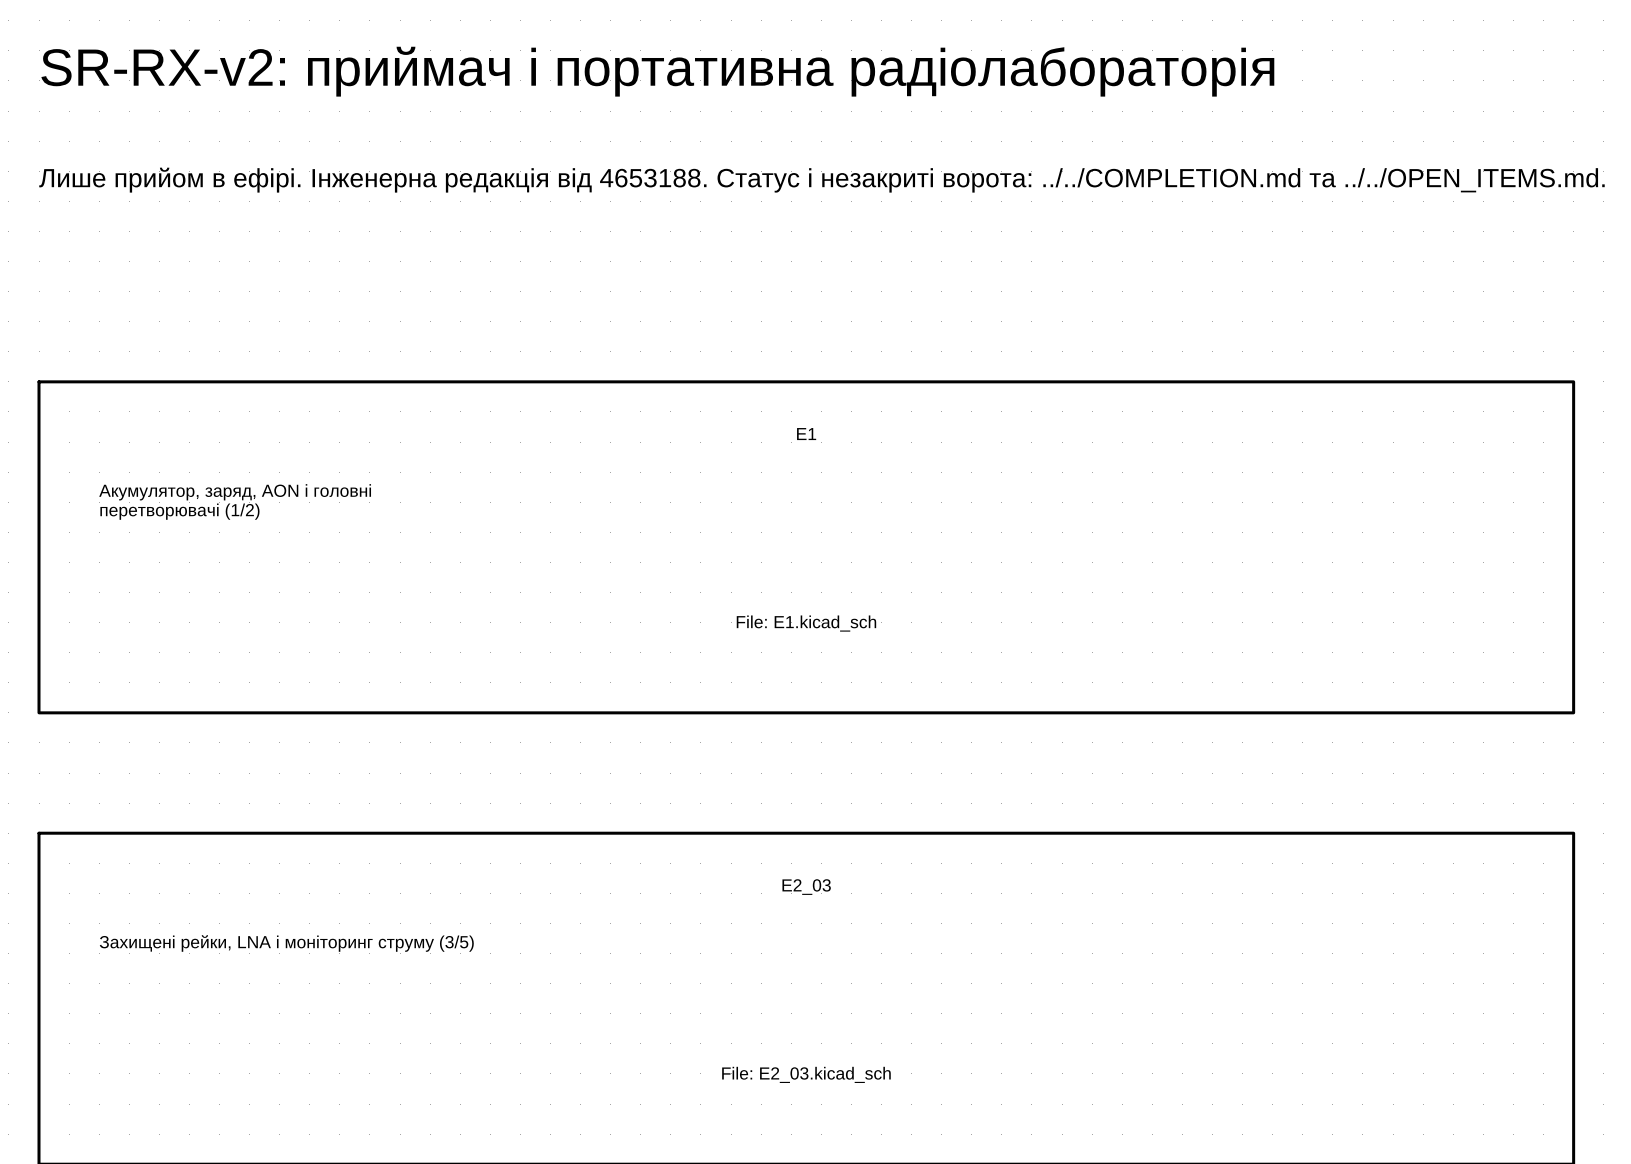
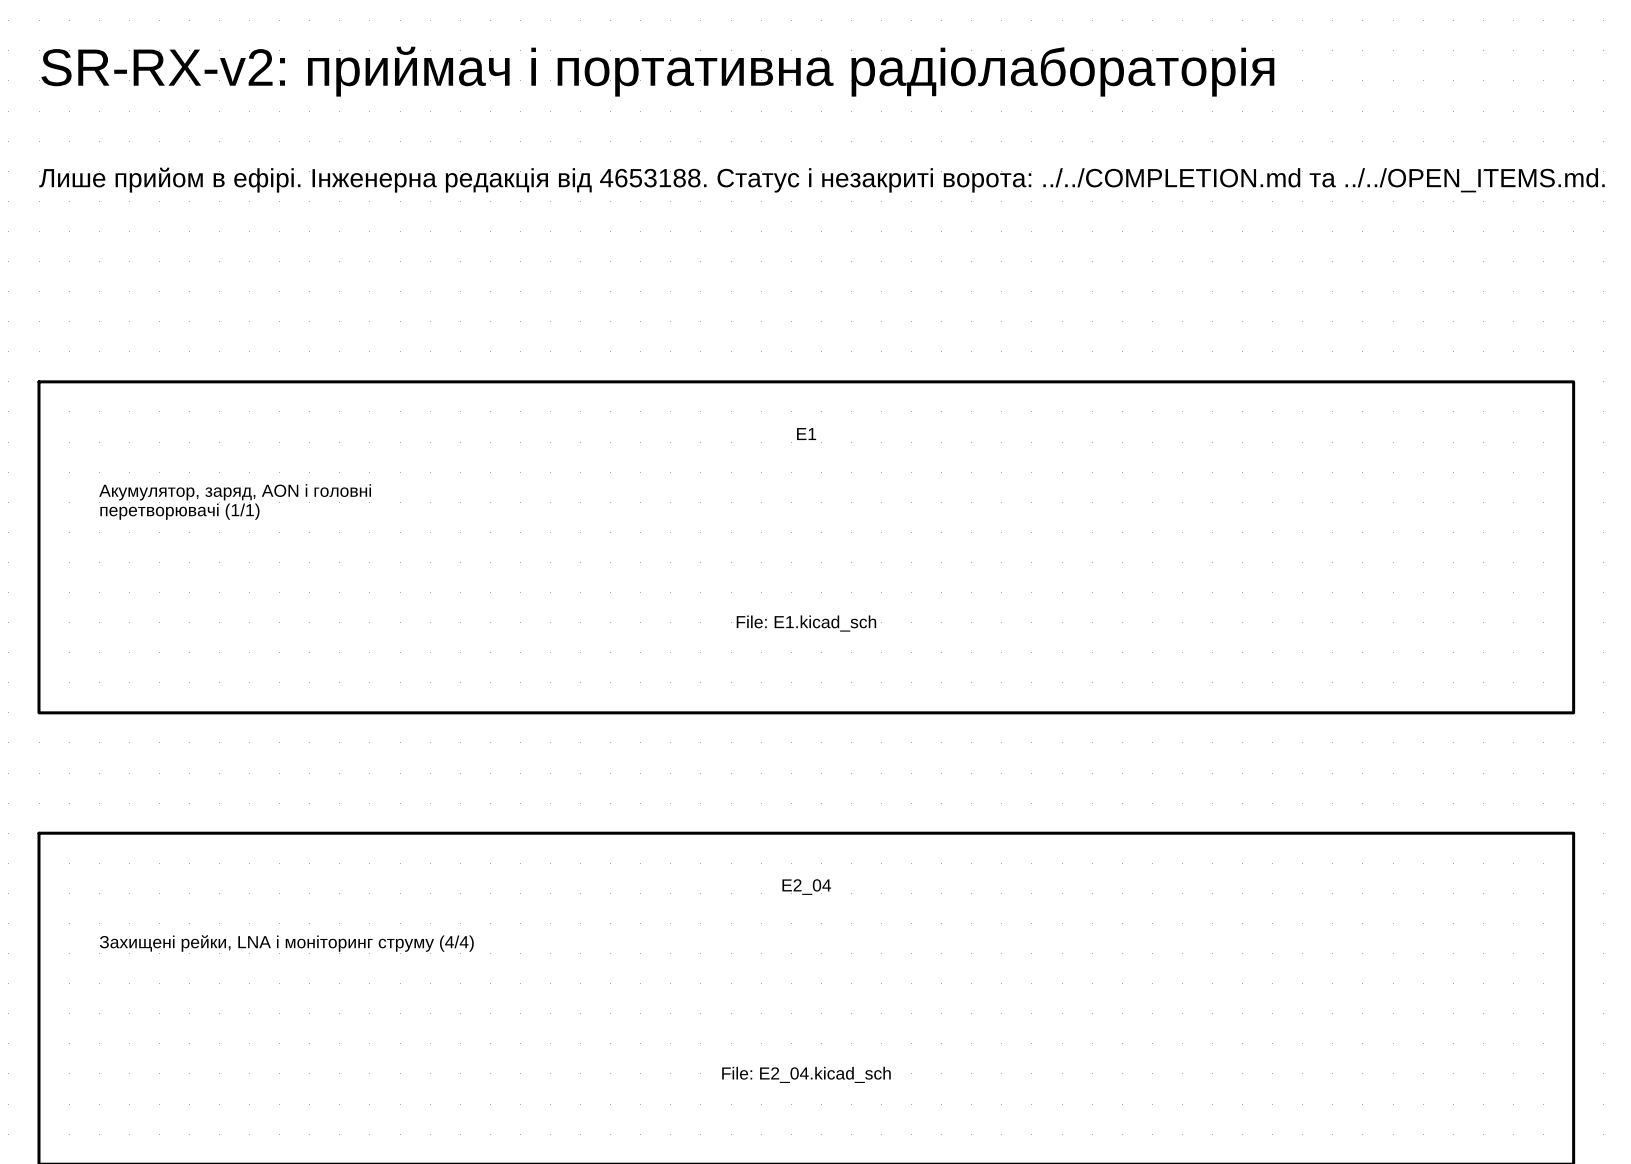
text: перетворювачі (1/2) (179, 511) -> перетворювачі (1/1) (179, 511)
sheet E2_03 name: E2_03 (806, 887) -> E2_04 (806, 887)
text: Захищені рейки, LNA і моніторинг струму (3/5) (286, 943) -> Захищені рейки, LNA і моніторинг струму (4/4) (286, 943)
sheet E2_03 value: File: E2_03.kicad_sch (806, 1074) -> File: E2_04.kicad_sch (806, 1074)

